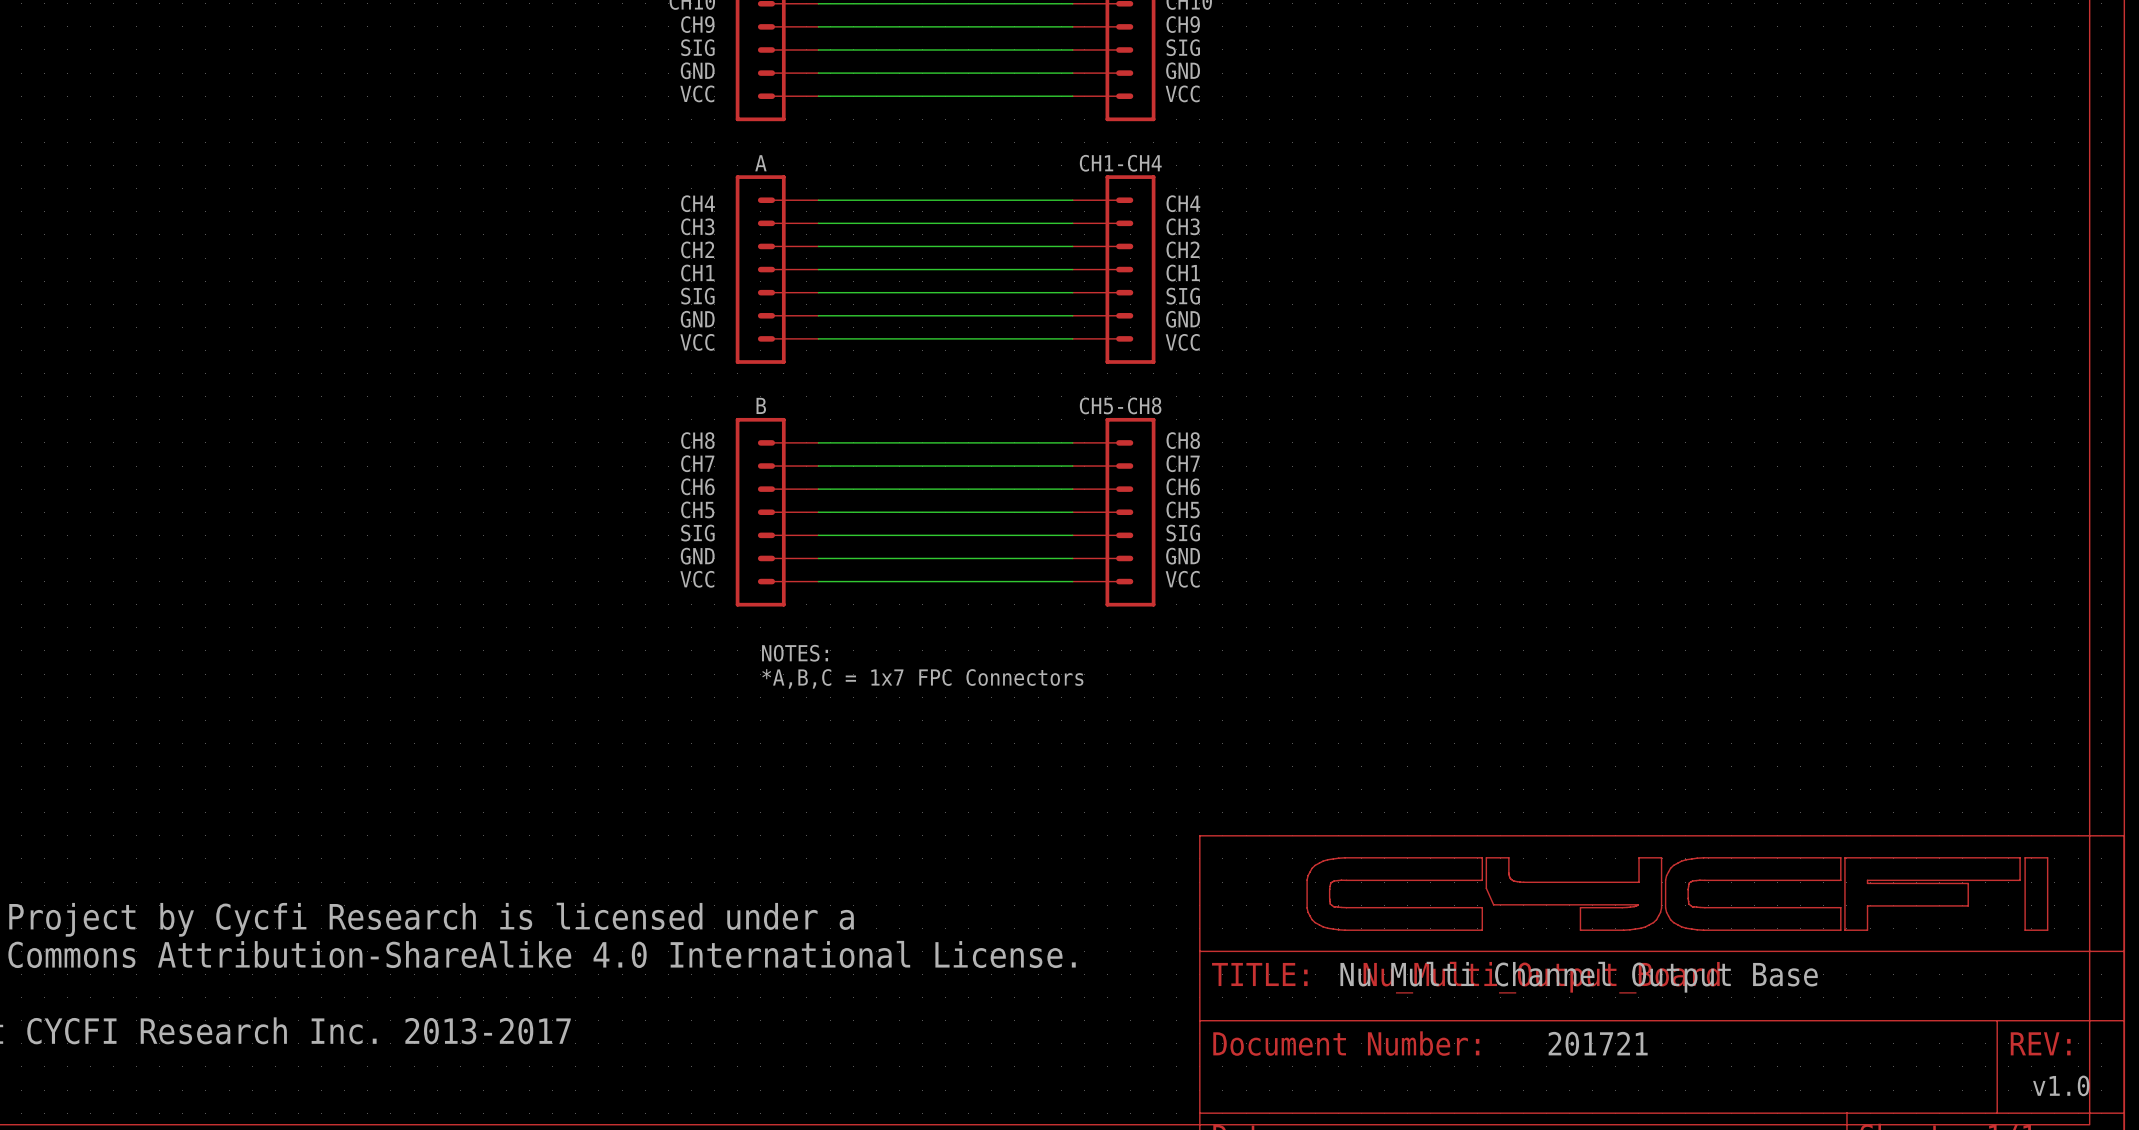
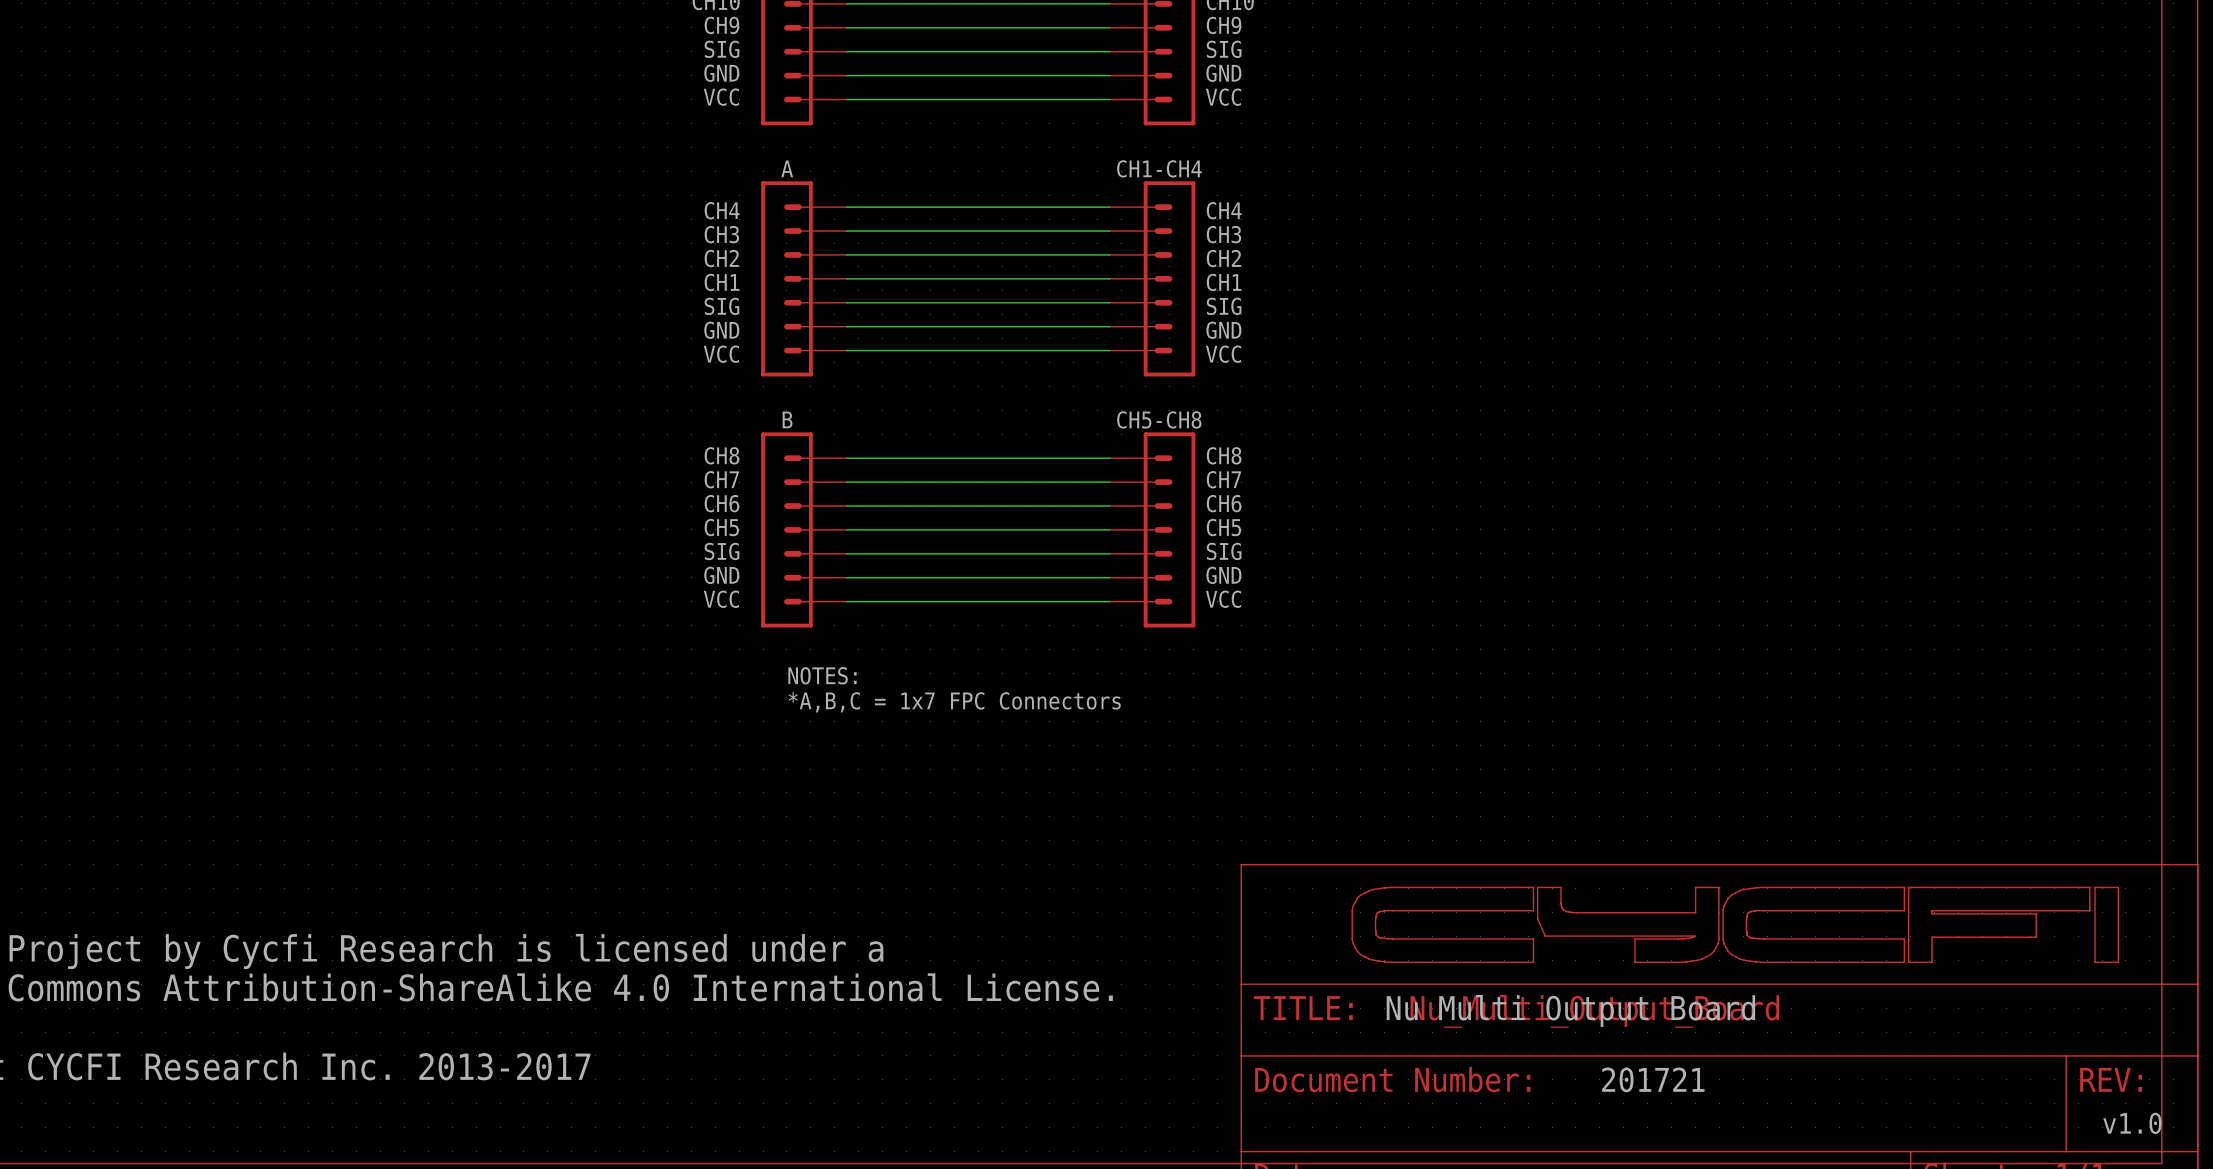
text: Nu Multi Channel Output Base (1579, 977) -> Nu Multi Output Board (1570, 1010)

